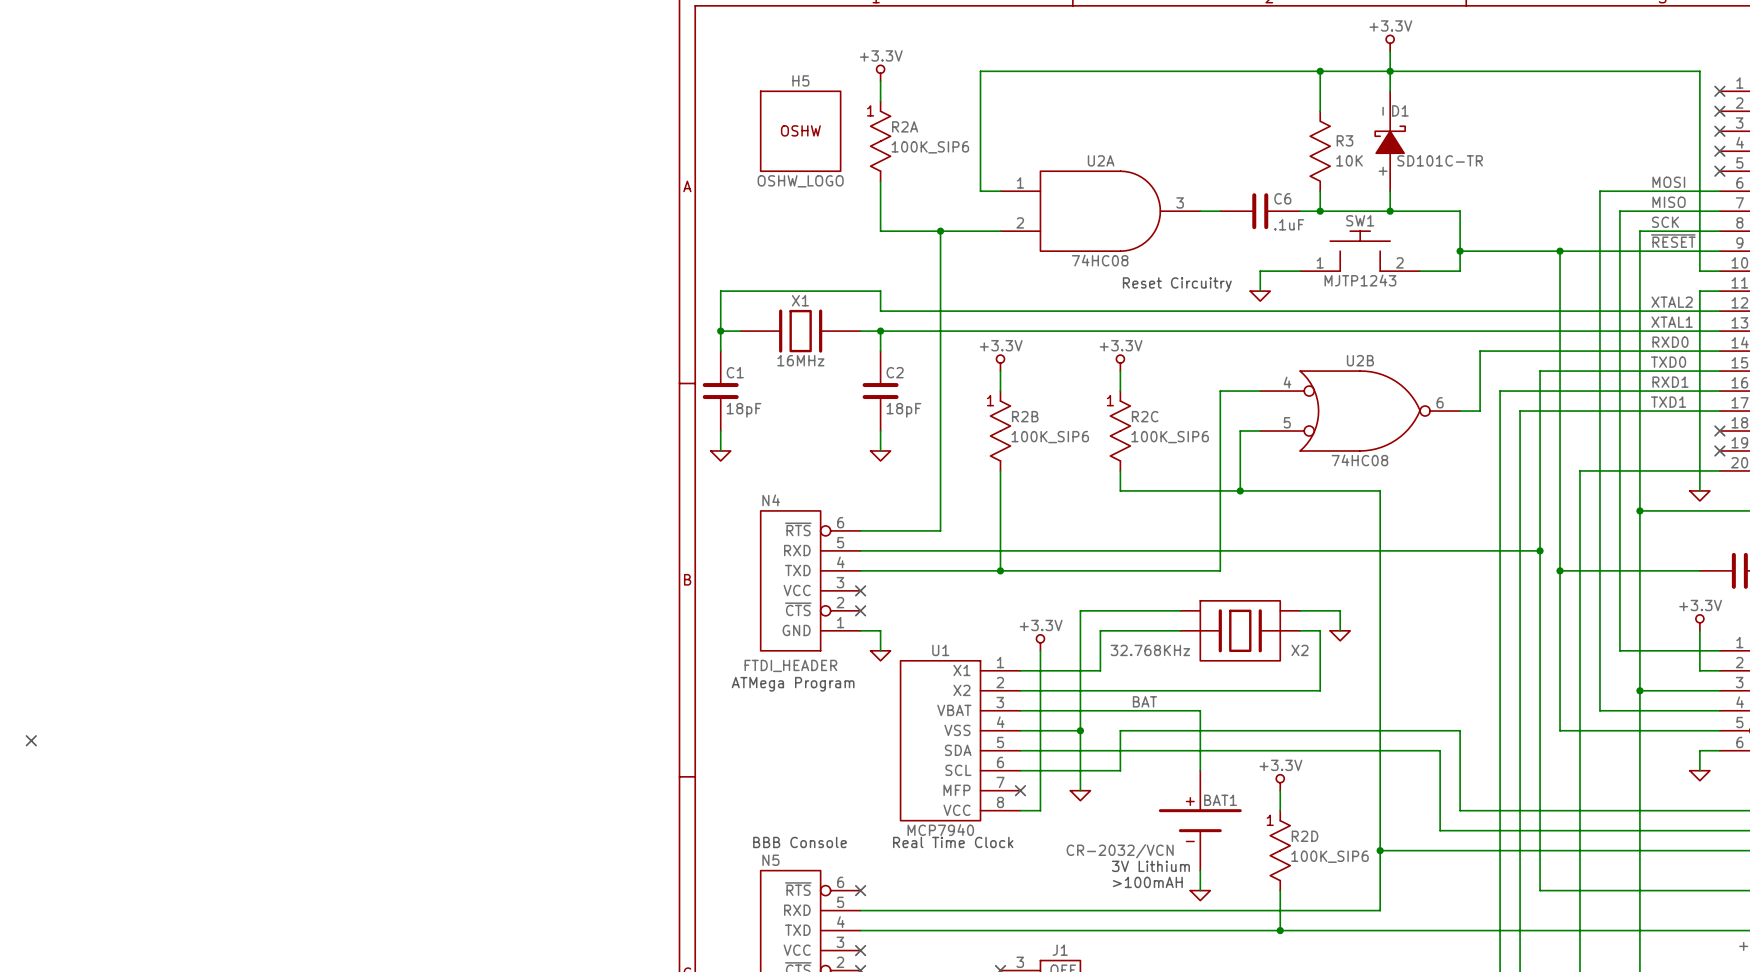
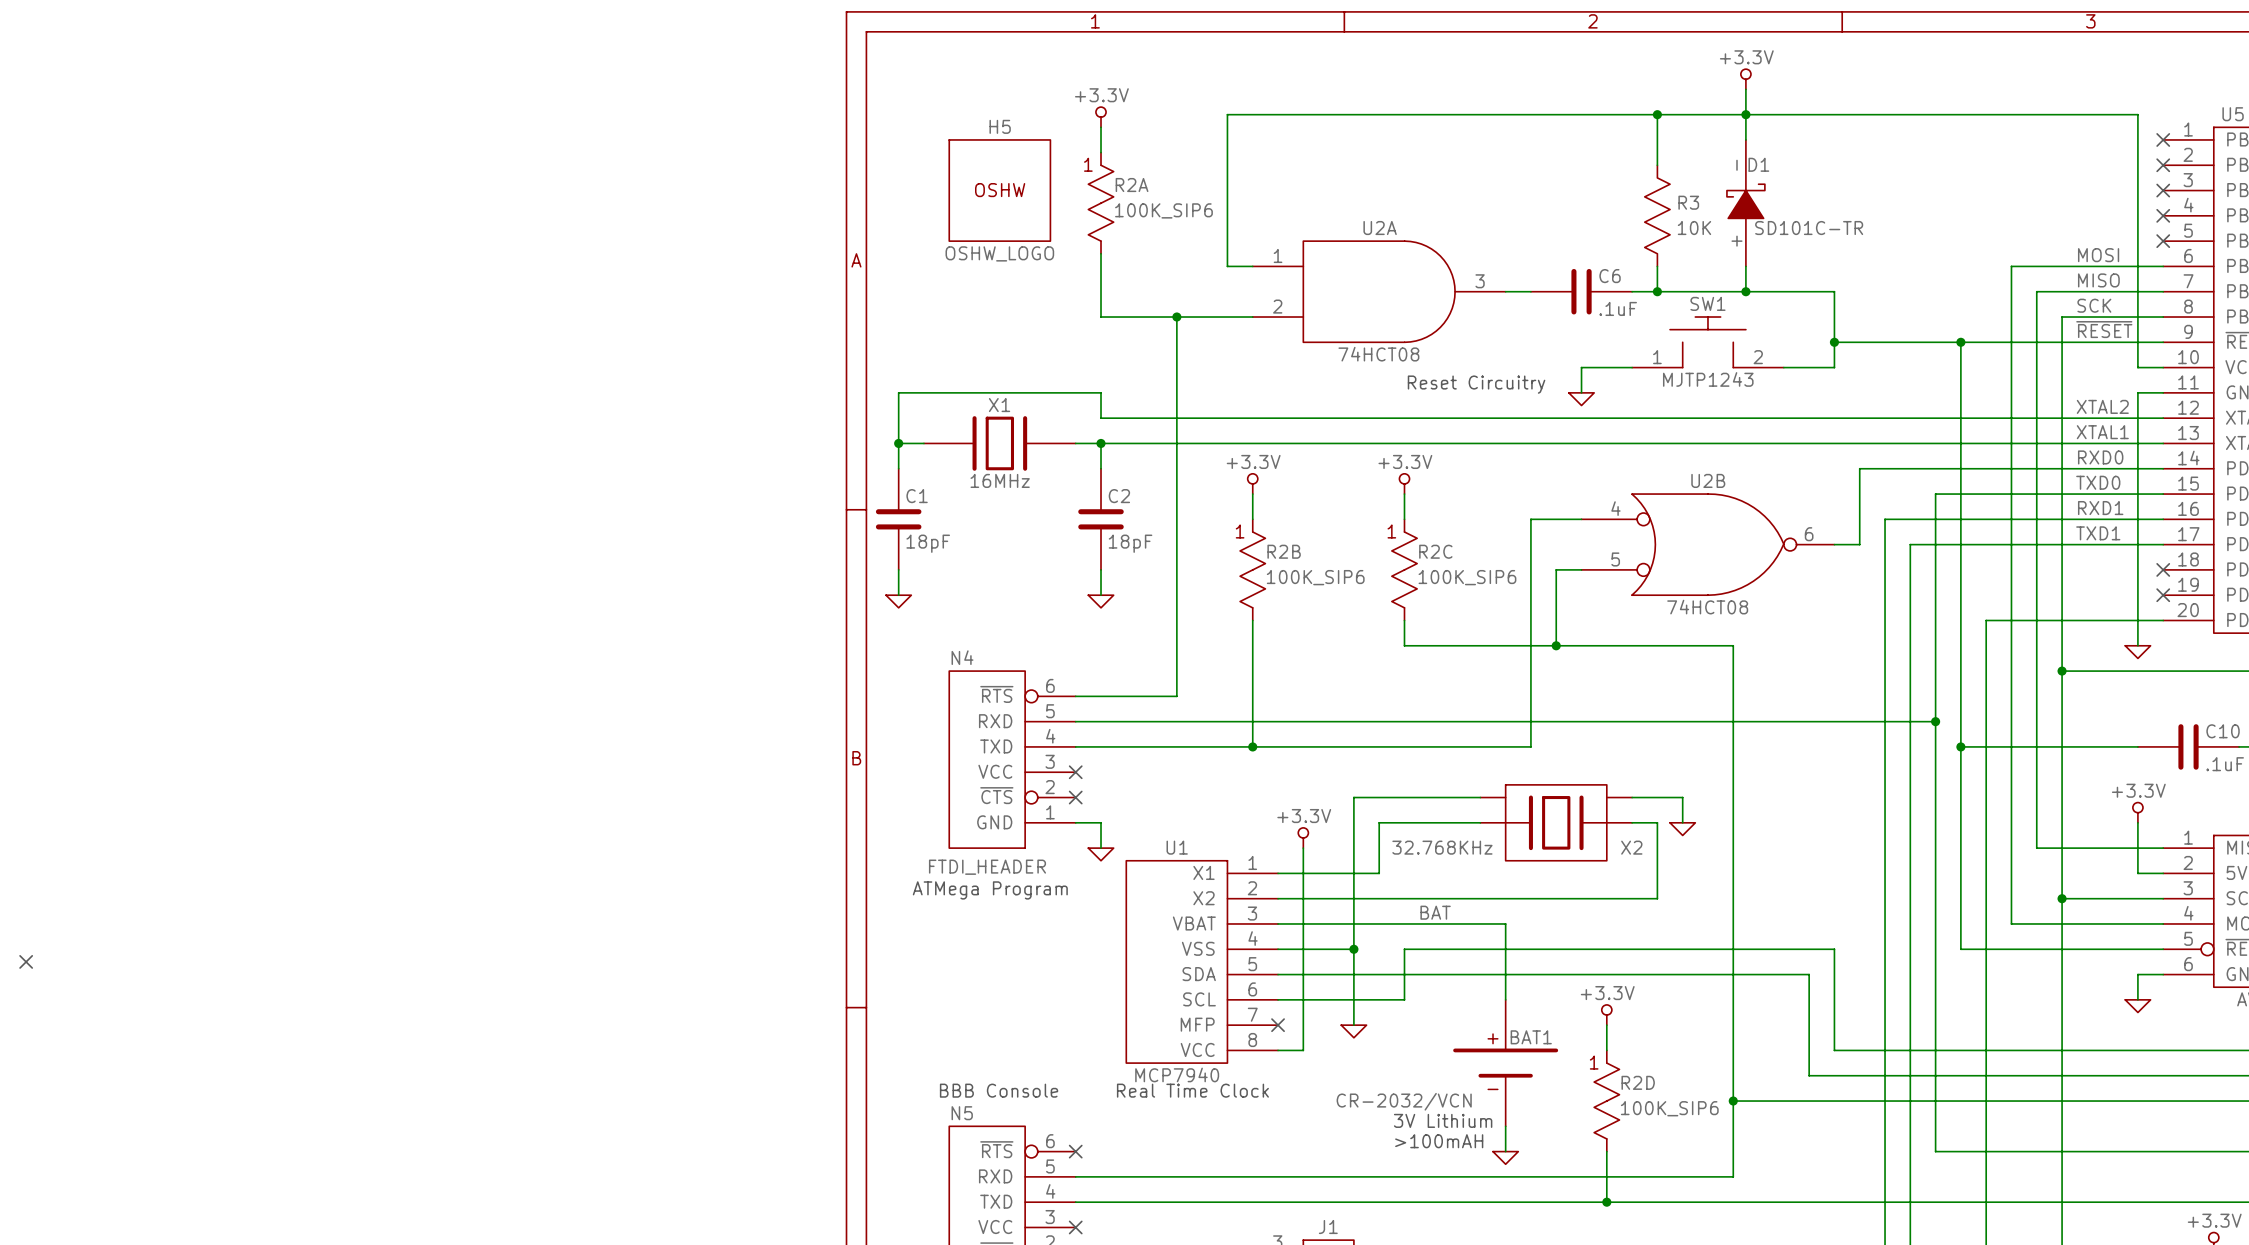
U2A value: 74HC08 (1100, 260) -> 74HCT08 (1378, 354)
U2B value: 74HC08 (1359, 460) -> 74HCT08 (1707, 607)

